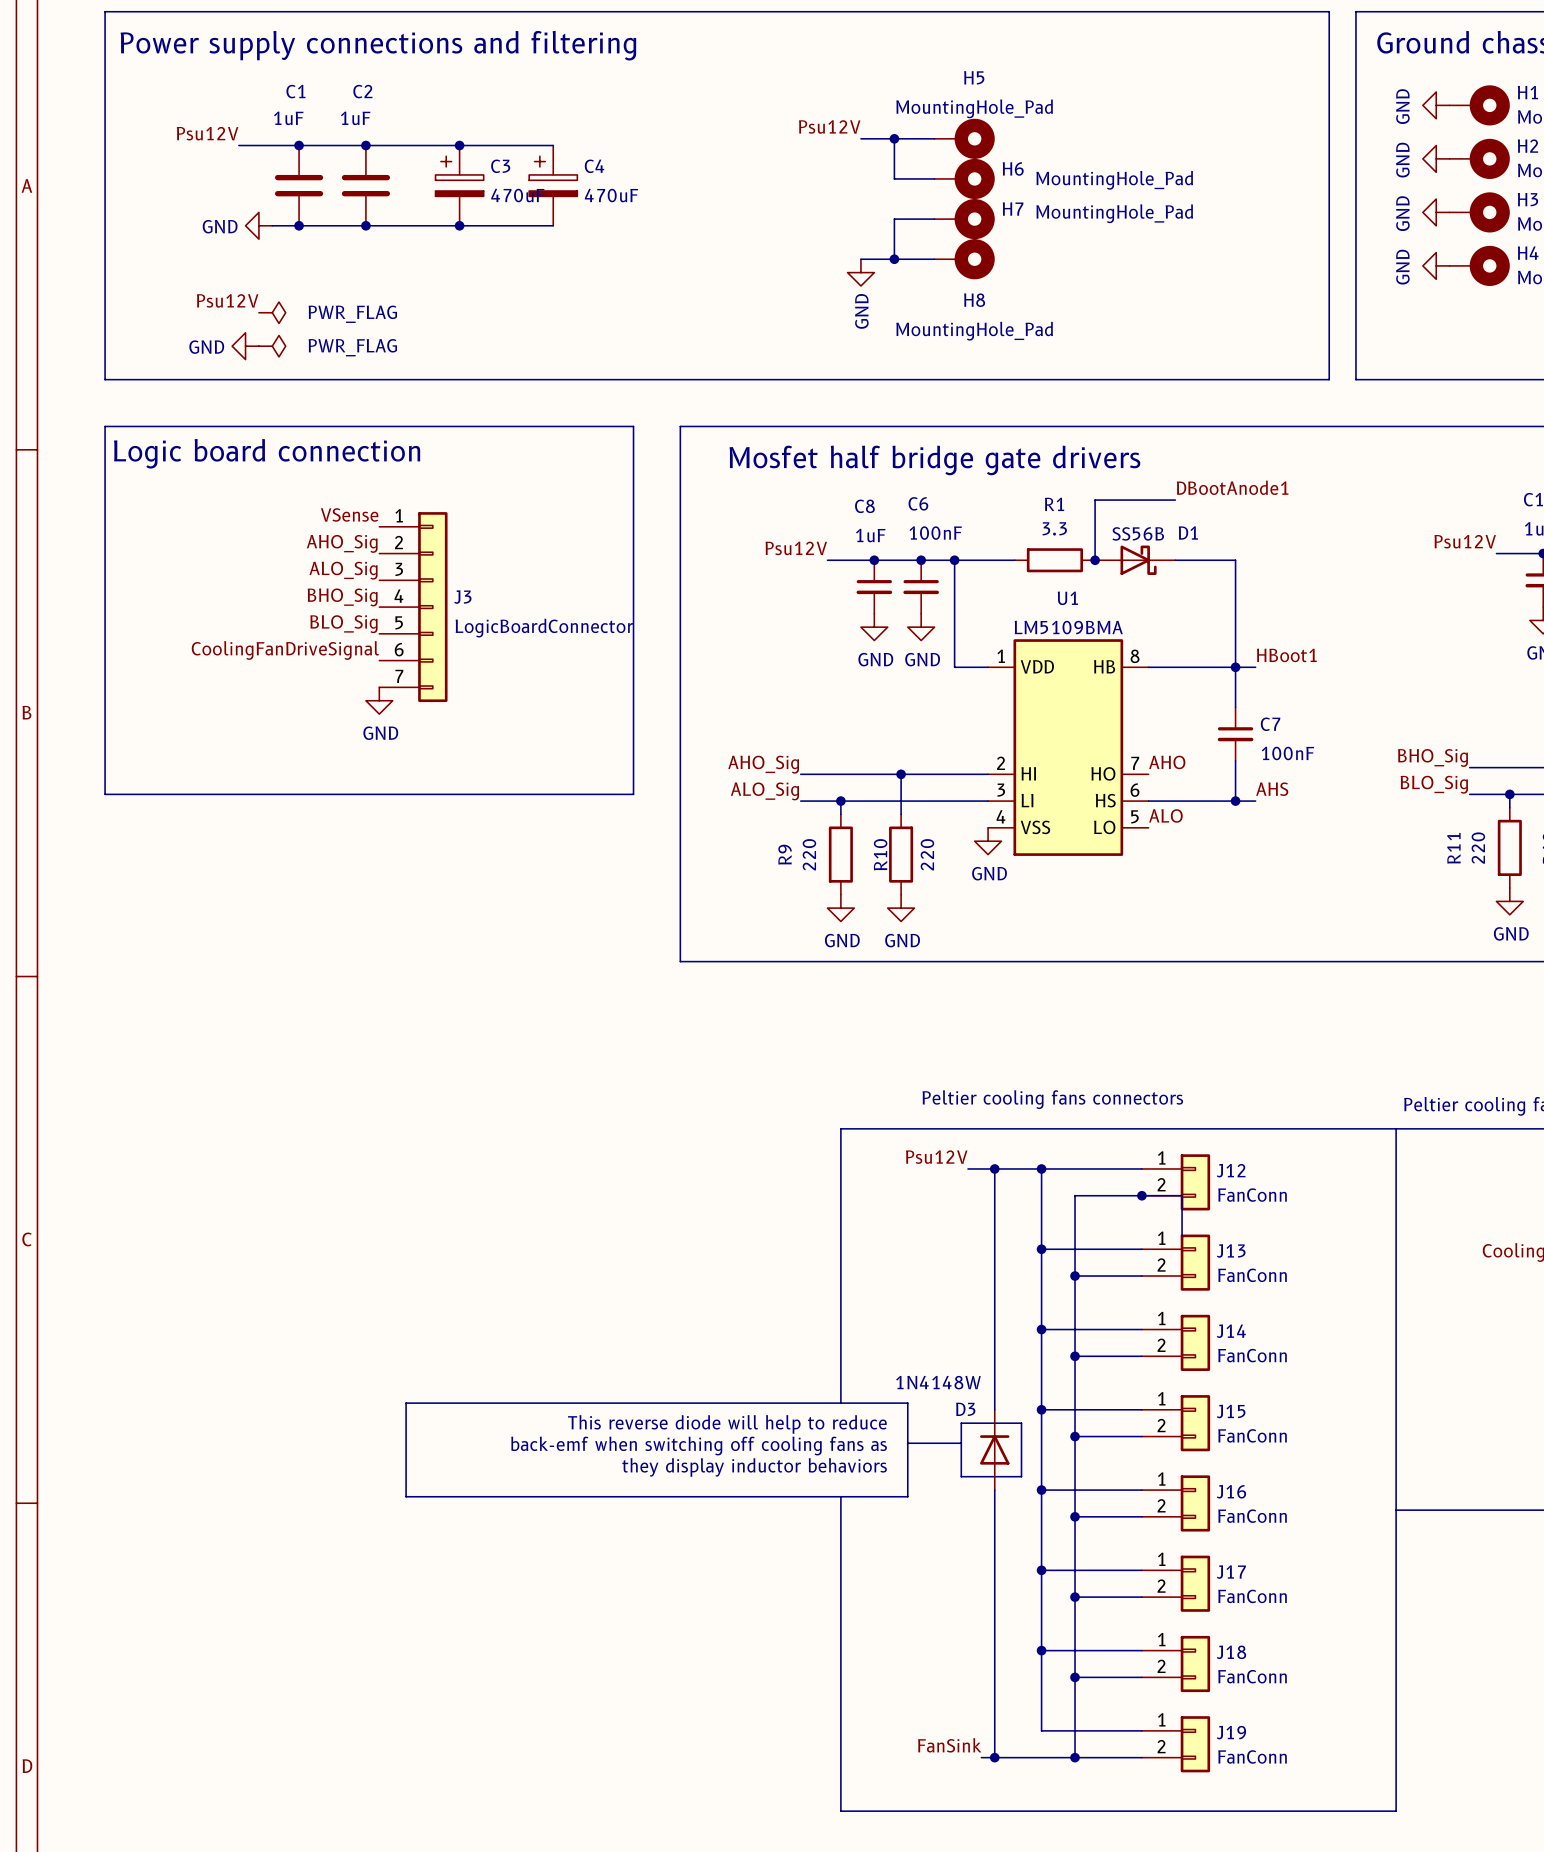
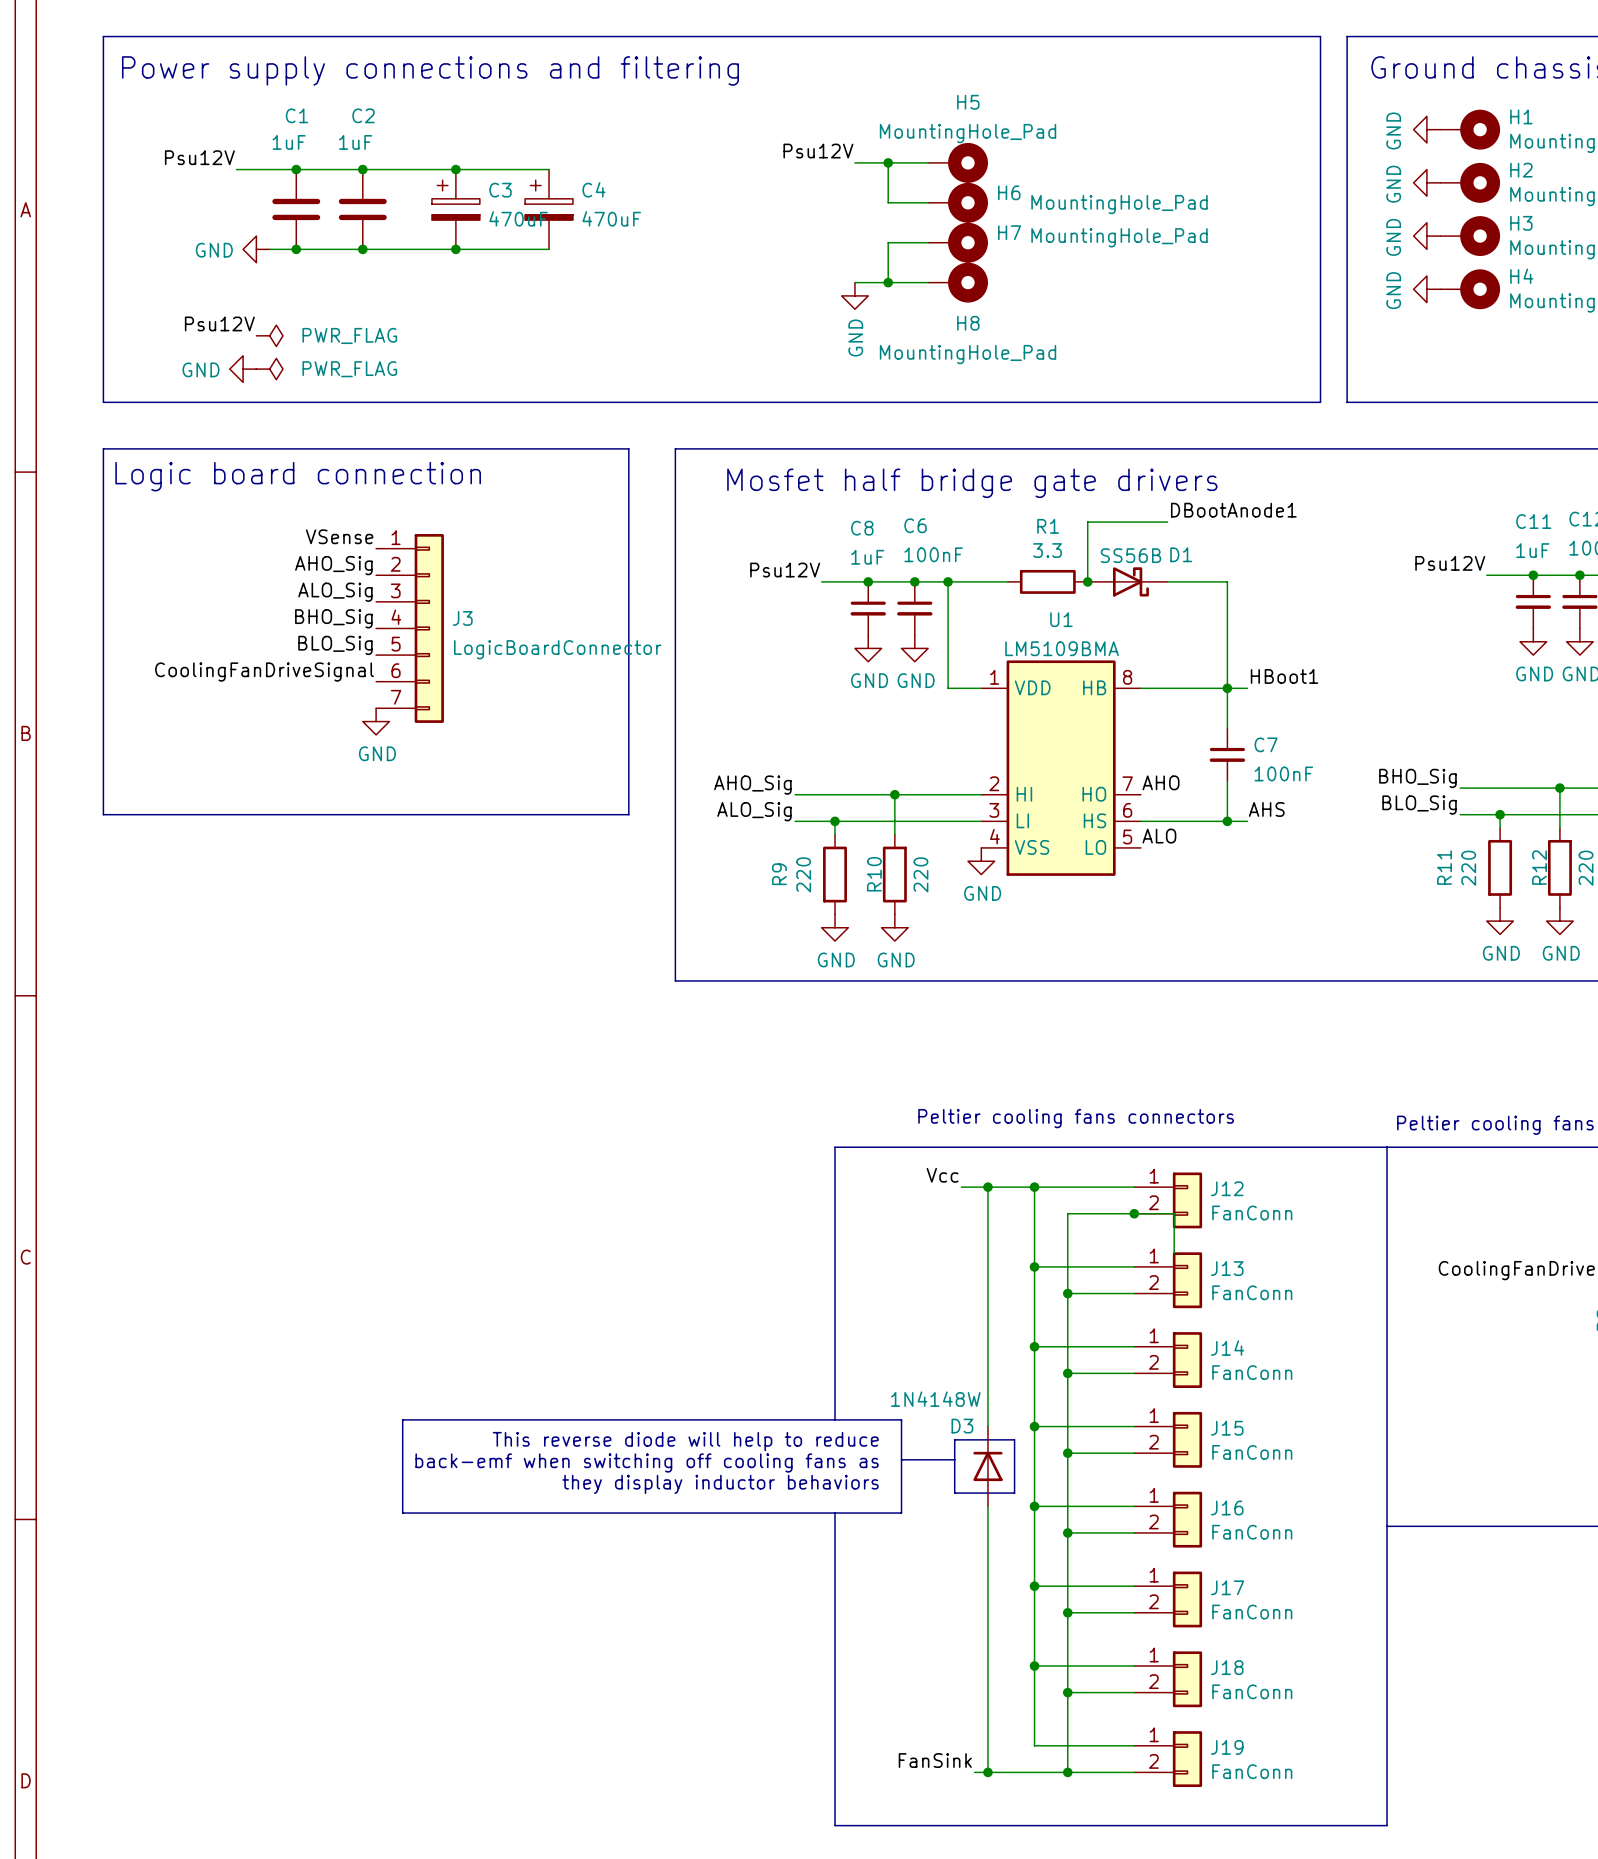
label: Psu12V (936, 1157) -> Vcc (942, 1175)

